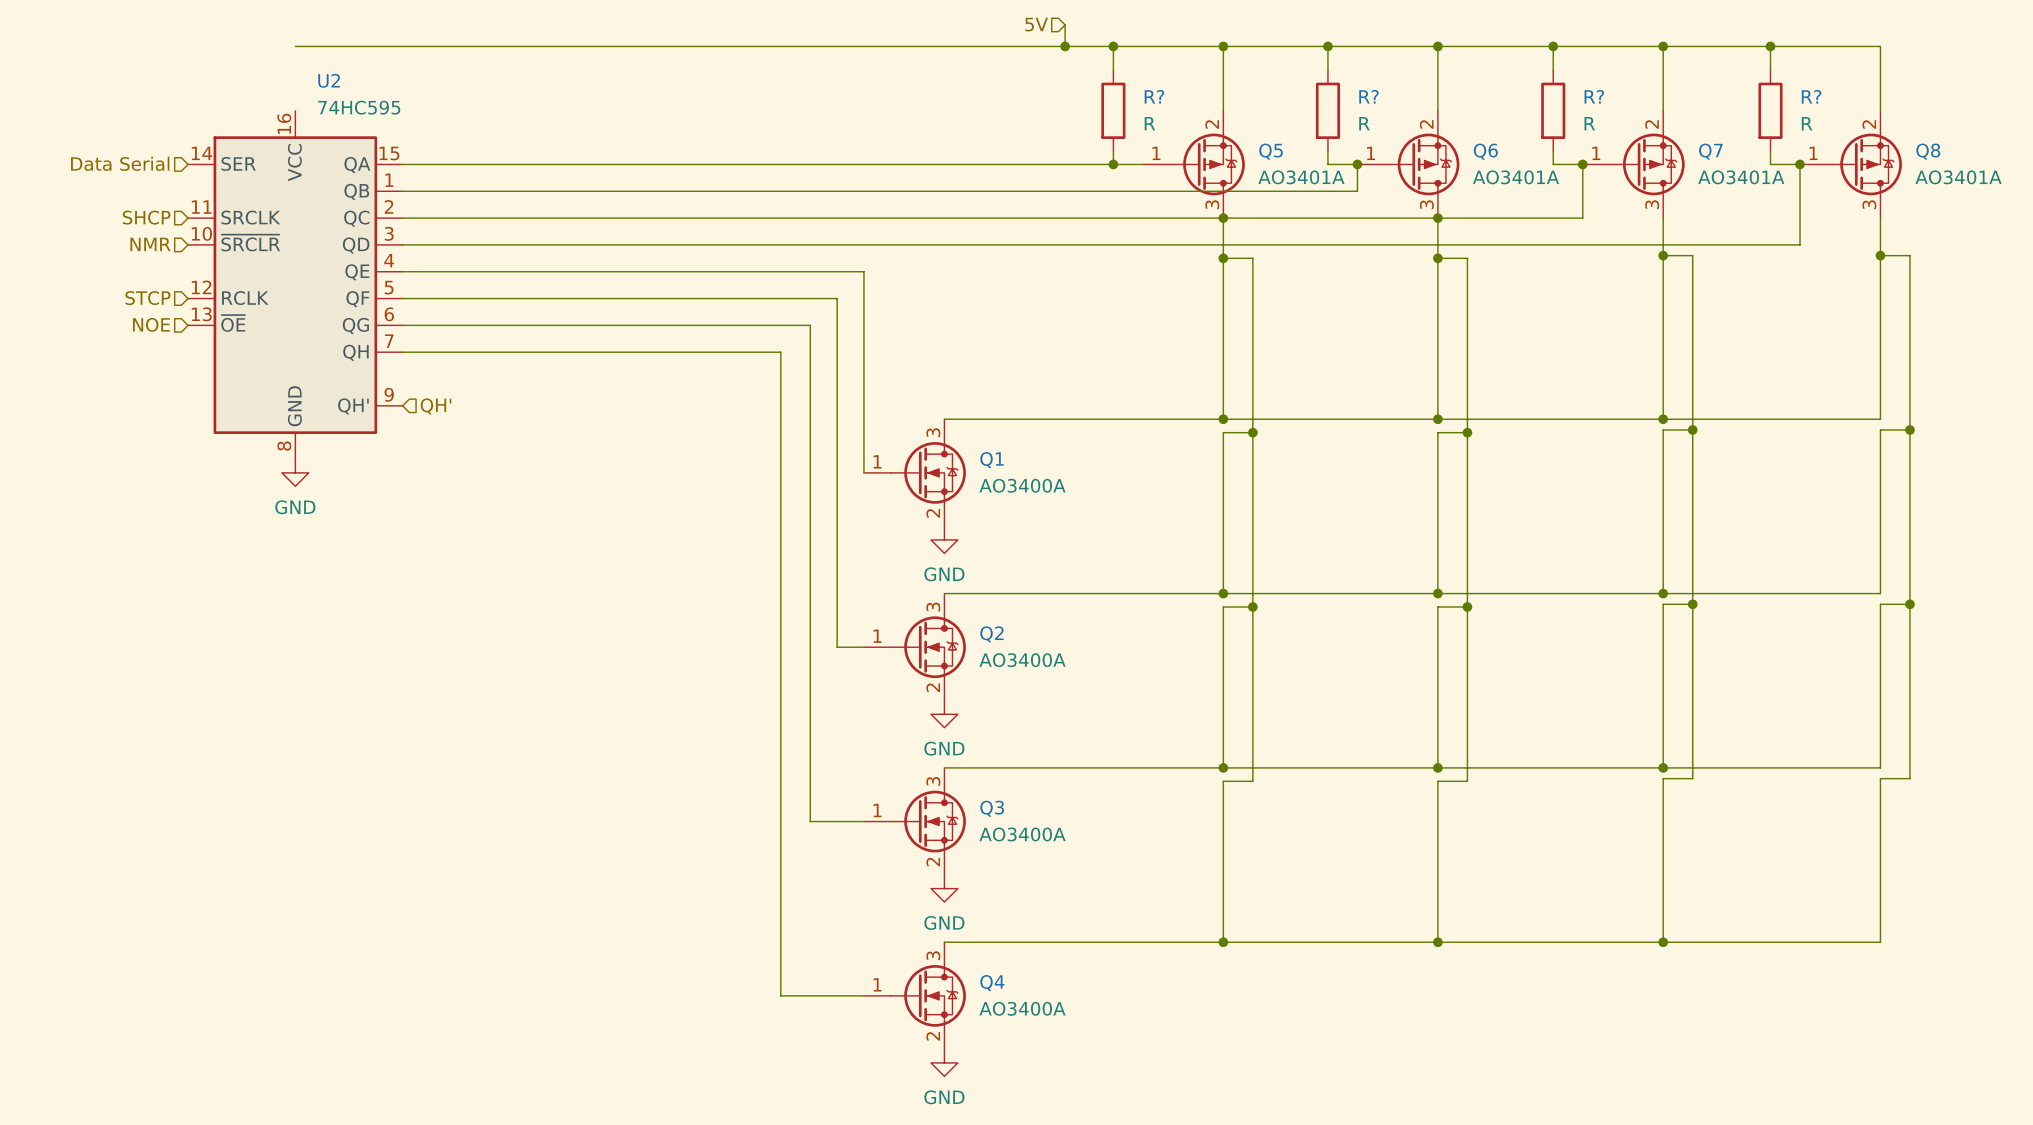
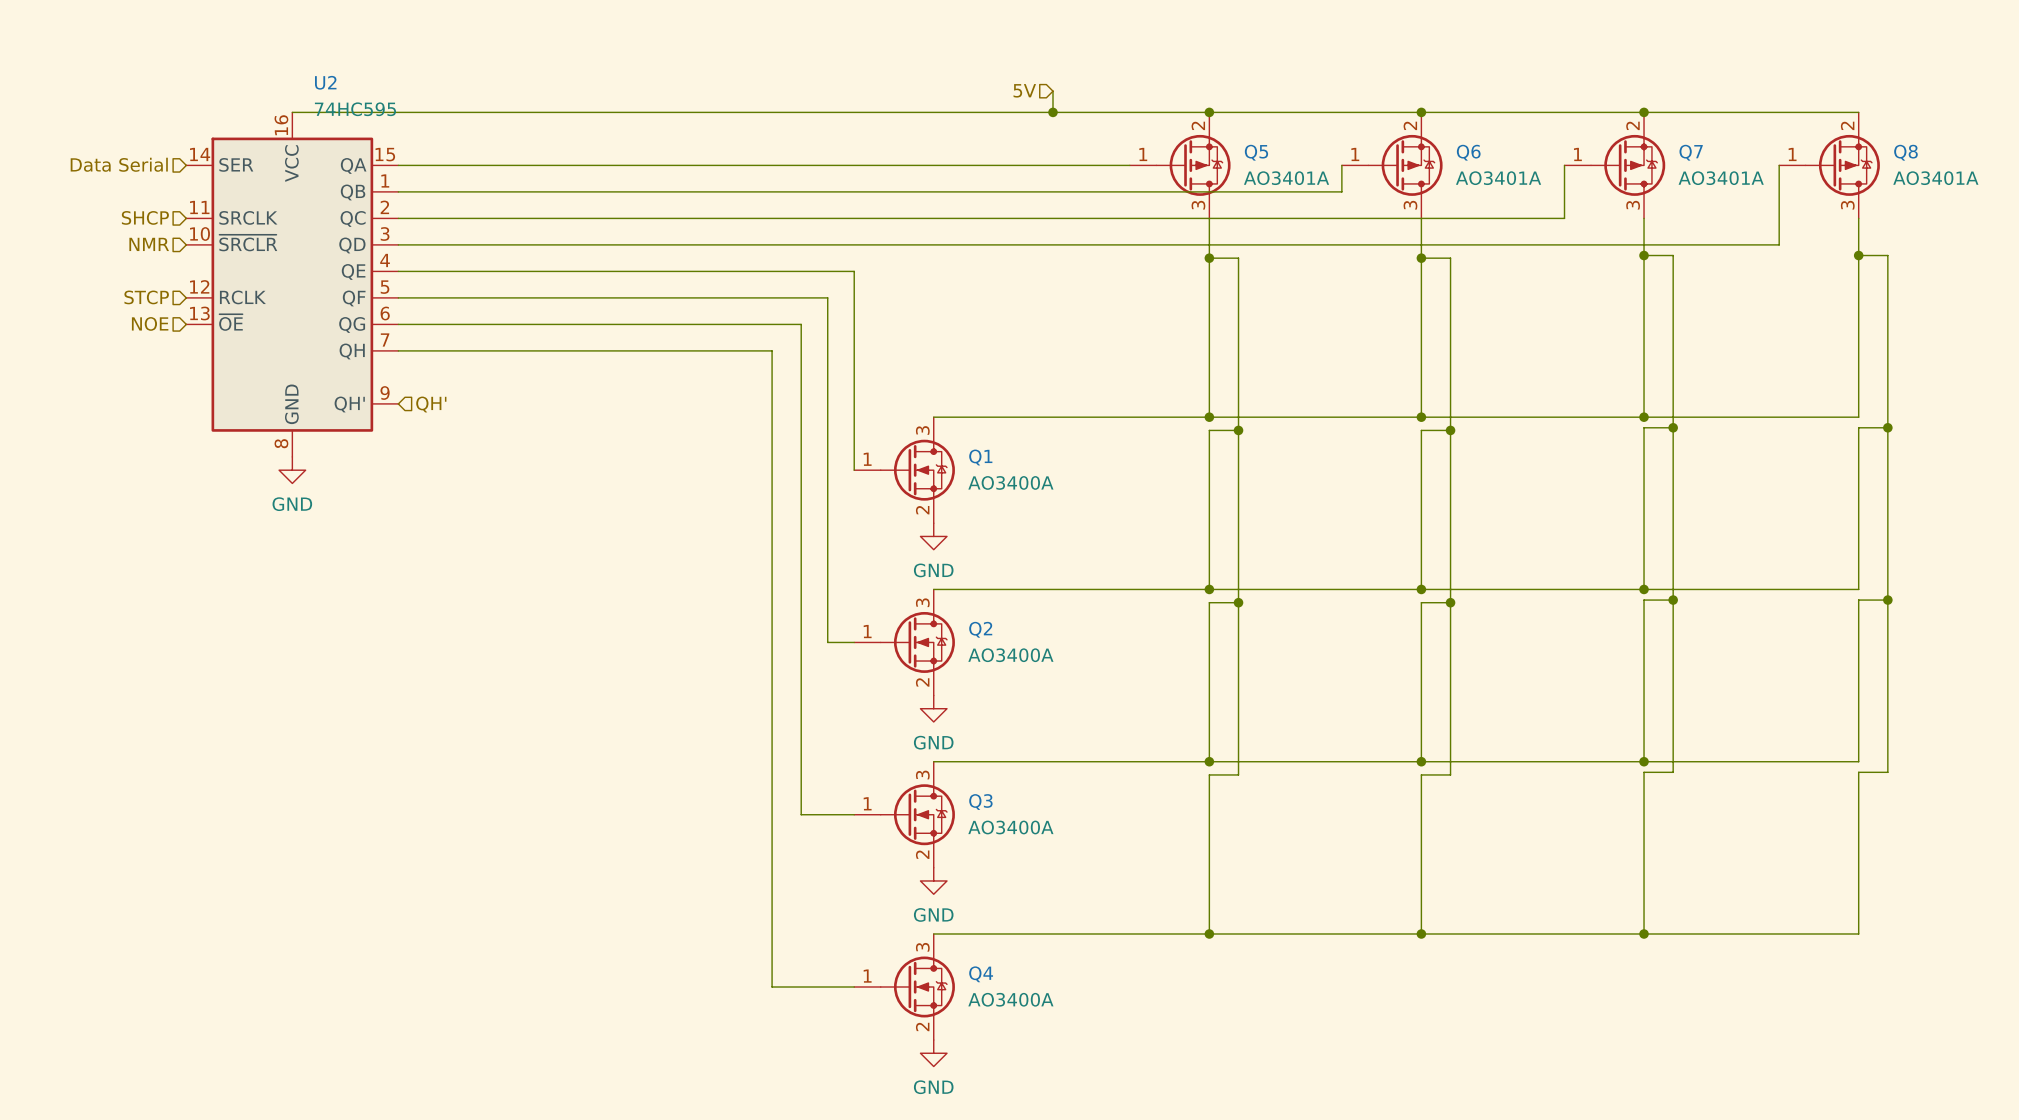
hierarchical label position: 5V (1036, 24) -> 5V (1024, 90)
wire: (1065, 24) (1065, 46) -> (1052, 91) (1052, 112)
wire: (295, 46) (1880, 46) (1880, 110) -> (292, 112) (1858, 112)
junction: (1065, 46) -> none
wire: (1113, 46) (1113, 70) -> none
junction: (1113, 46) -> none
wire: (1223, 46) (1223, 110) -> none
junction: (1223, 46) -> none
wire: (1327, 46) (1327, 70) -> none
junction: (1327, 46) -> none
wire: (1437, 46) (1437, 110) -> none
junction: (1437, 46) -> none
wire: (1553, 46) (1553, 70) -> none
junction: (1553, 46) -> none
wire: (1663, 46) (1663, 110) -> none
junction: (1663, 46) -> none
wire: (1770, 46) (1770, 70) -> none
junction: (1770, 46) -> none
junction: none -> (1052, 112)
R?: R (1113, 110) -> none
junction: none -> (1209, 112)
R?: R (1327, 110) -> none
junction: none -> (1421, 112)
R?: R (1553, 110) -> none
junction: none -> (1644, 112)
R?: R (1770, 110) -> none
wire: (1113, 151) (1113, 164) -> none
wire: (1327, 151) (1327, 164) (1357, 164) -> none
wire: (1553, 151) (1553, 164) (1582, 164) -> none
wire: (1770, 151) (1770, 164) (1800, 164) -> none
junction: (1113, 164) -> none
junction: (1357, 164) -> none
junction: (1582, 164) -> none
junction: (1800, 164) -> none
junction: (1223, 218) -> none
junction: (1437, 218) -> none

